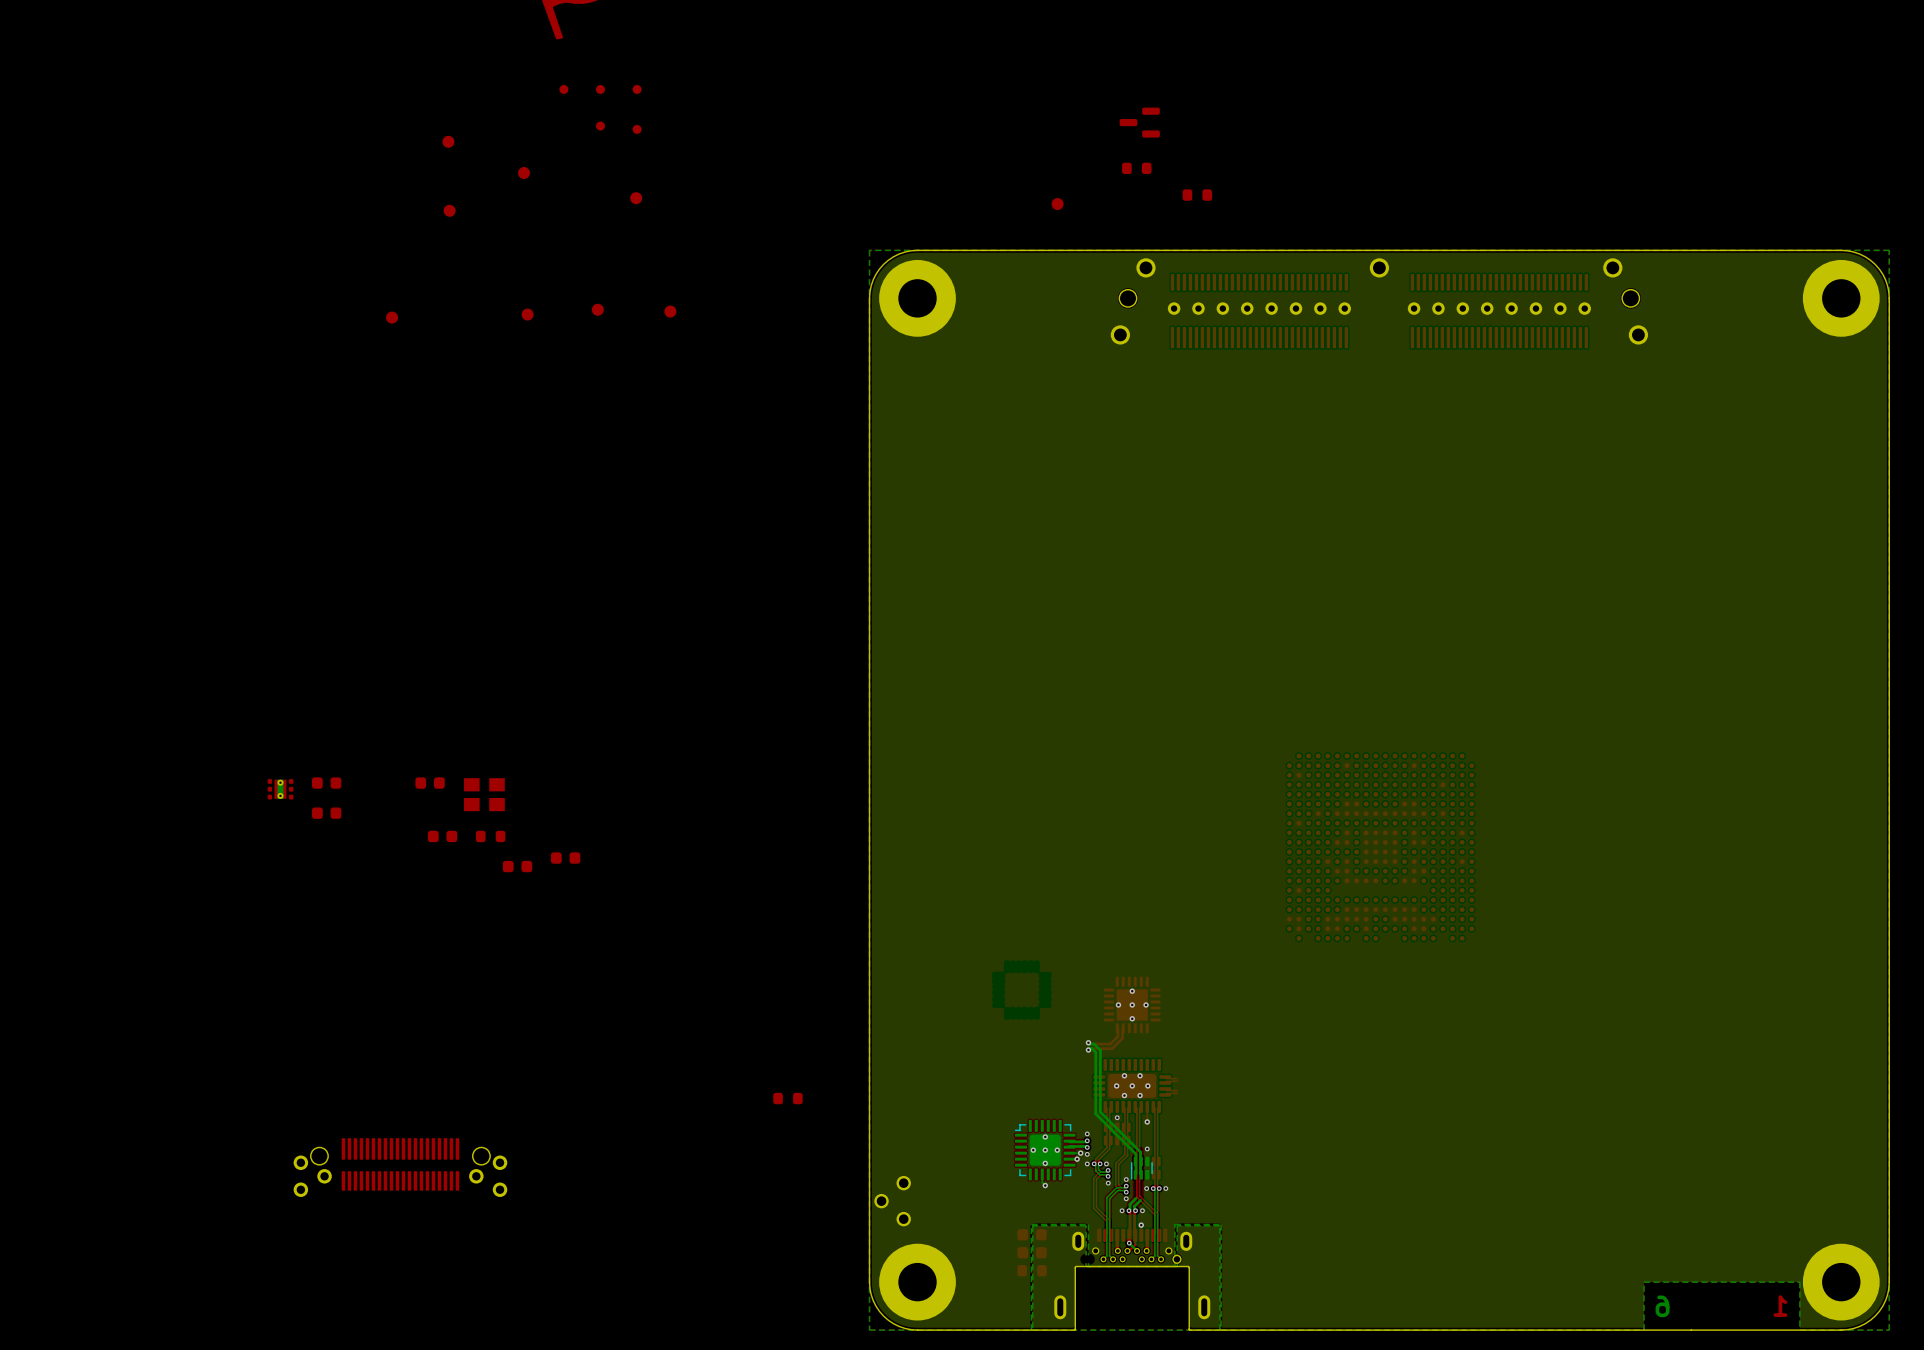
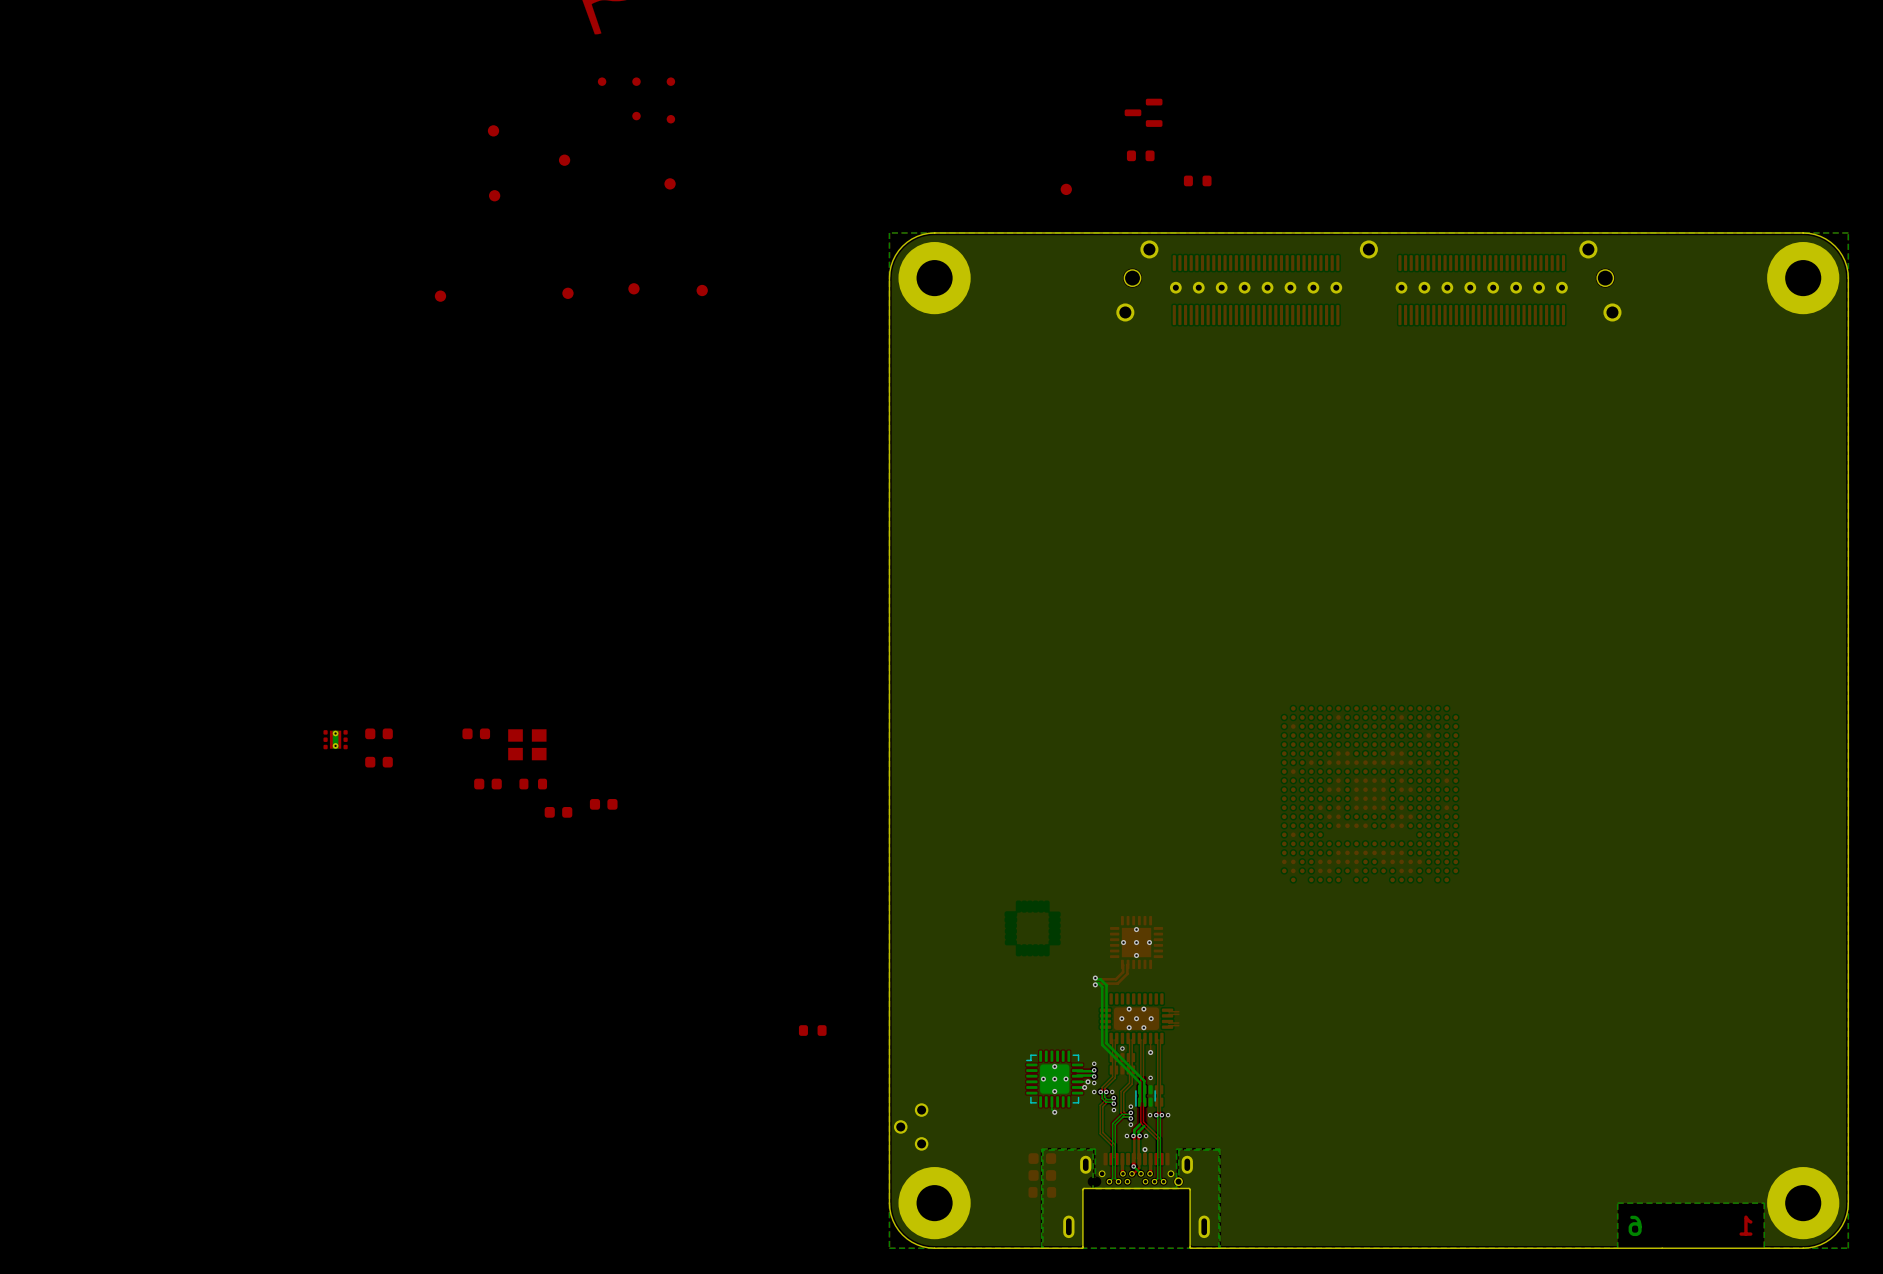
part: (400, 1167) -> none

